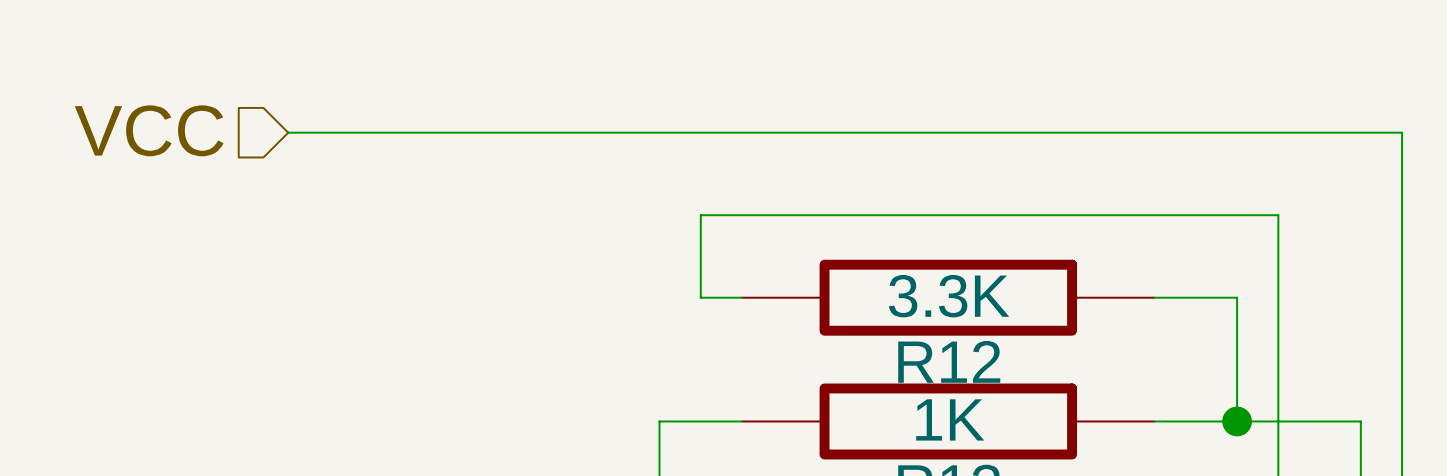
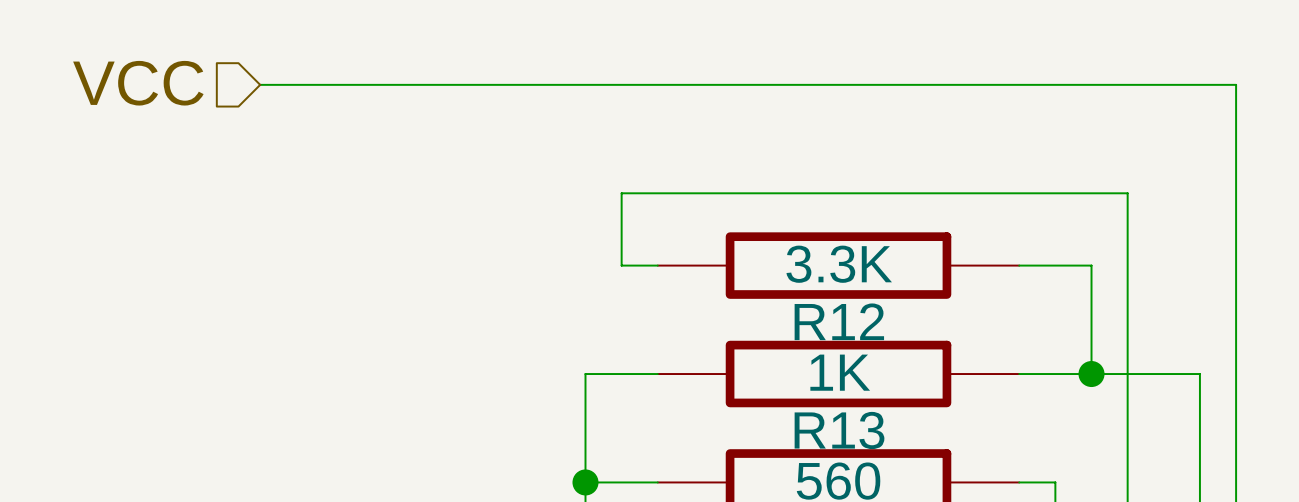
hierarchical label position: VCC (149, 130) -> VCC (138, 83)
wire: (288, 132) (1402, 132) -> (260, 84) (1236, 84) (1236, 121)

